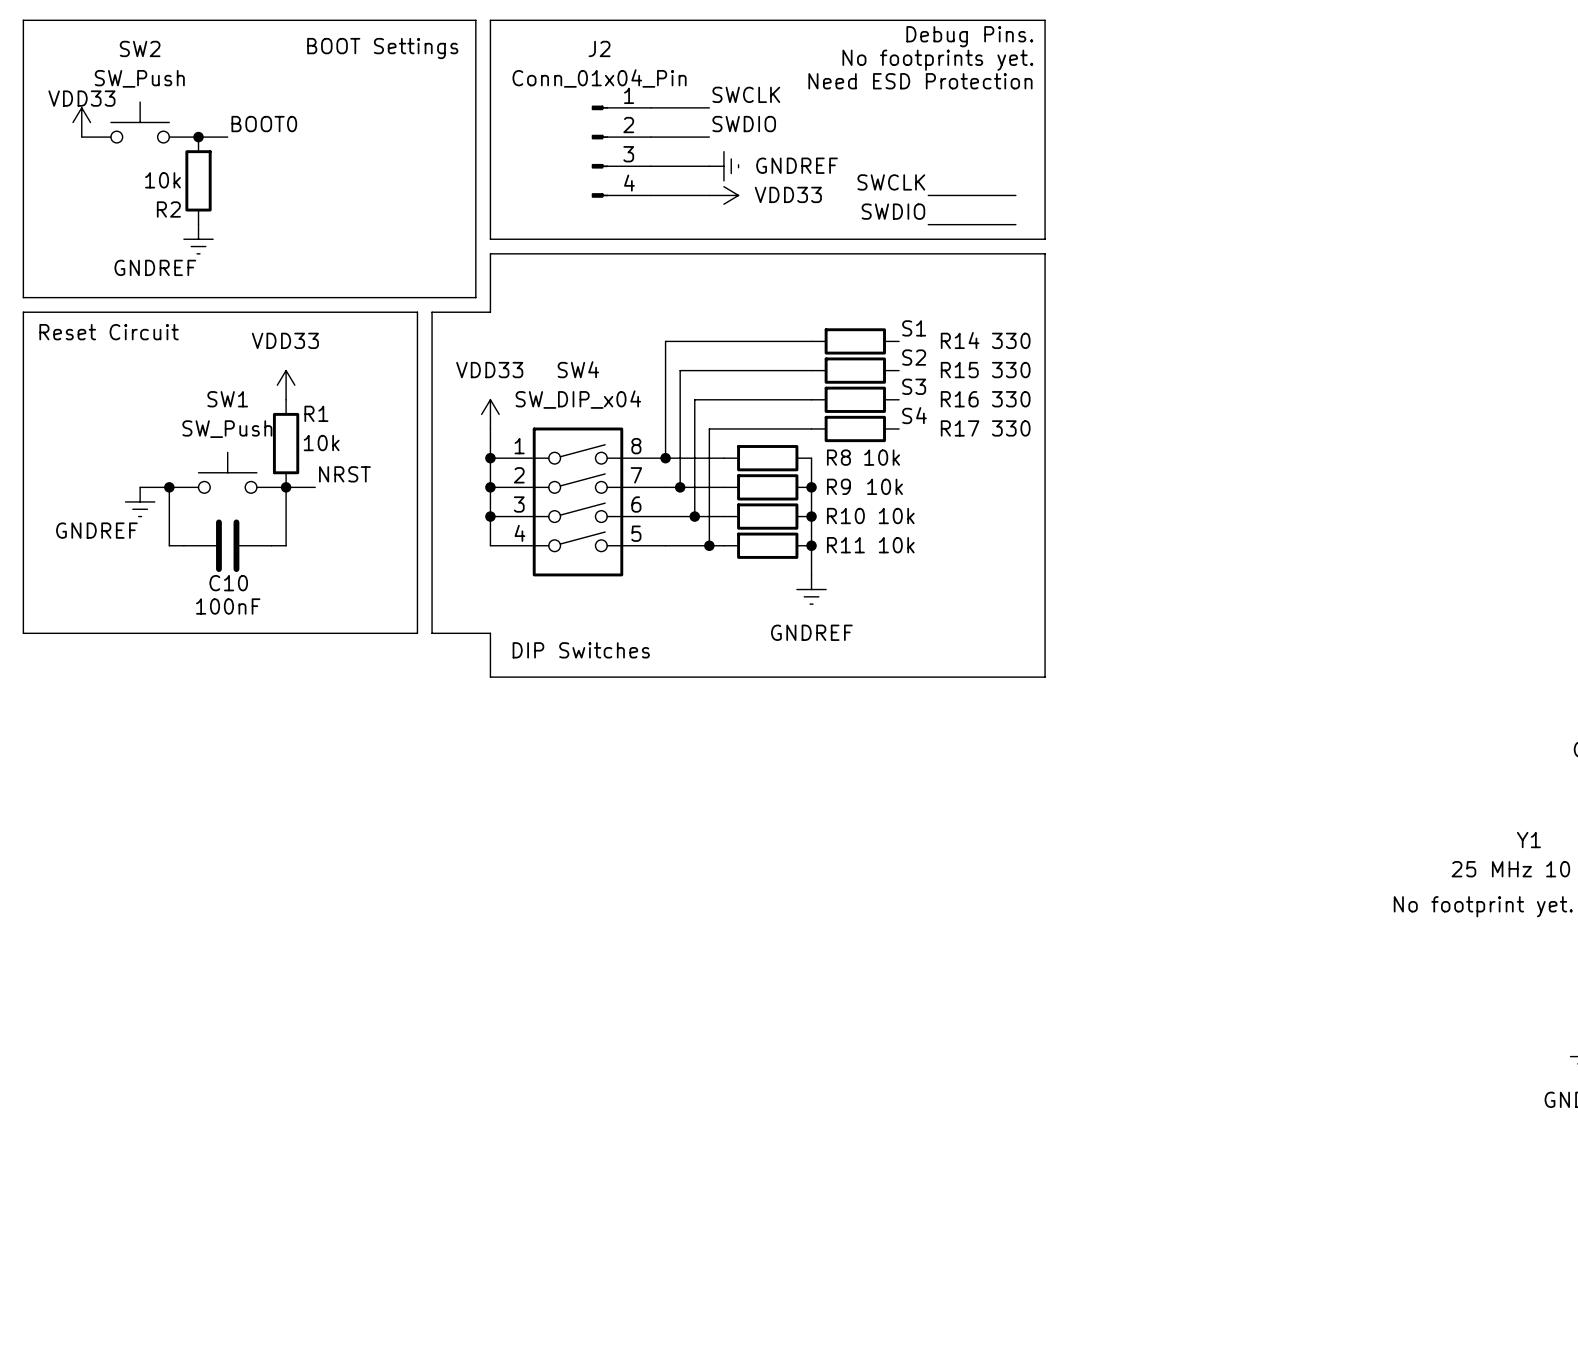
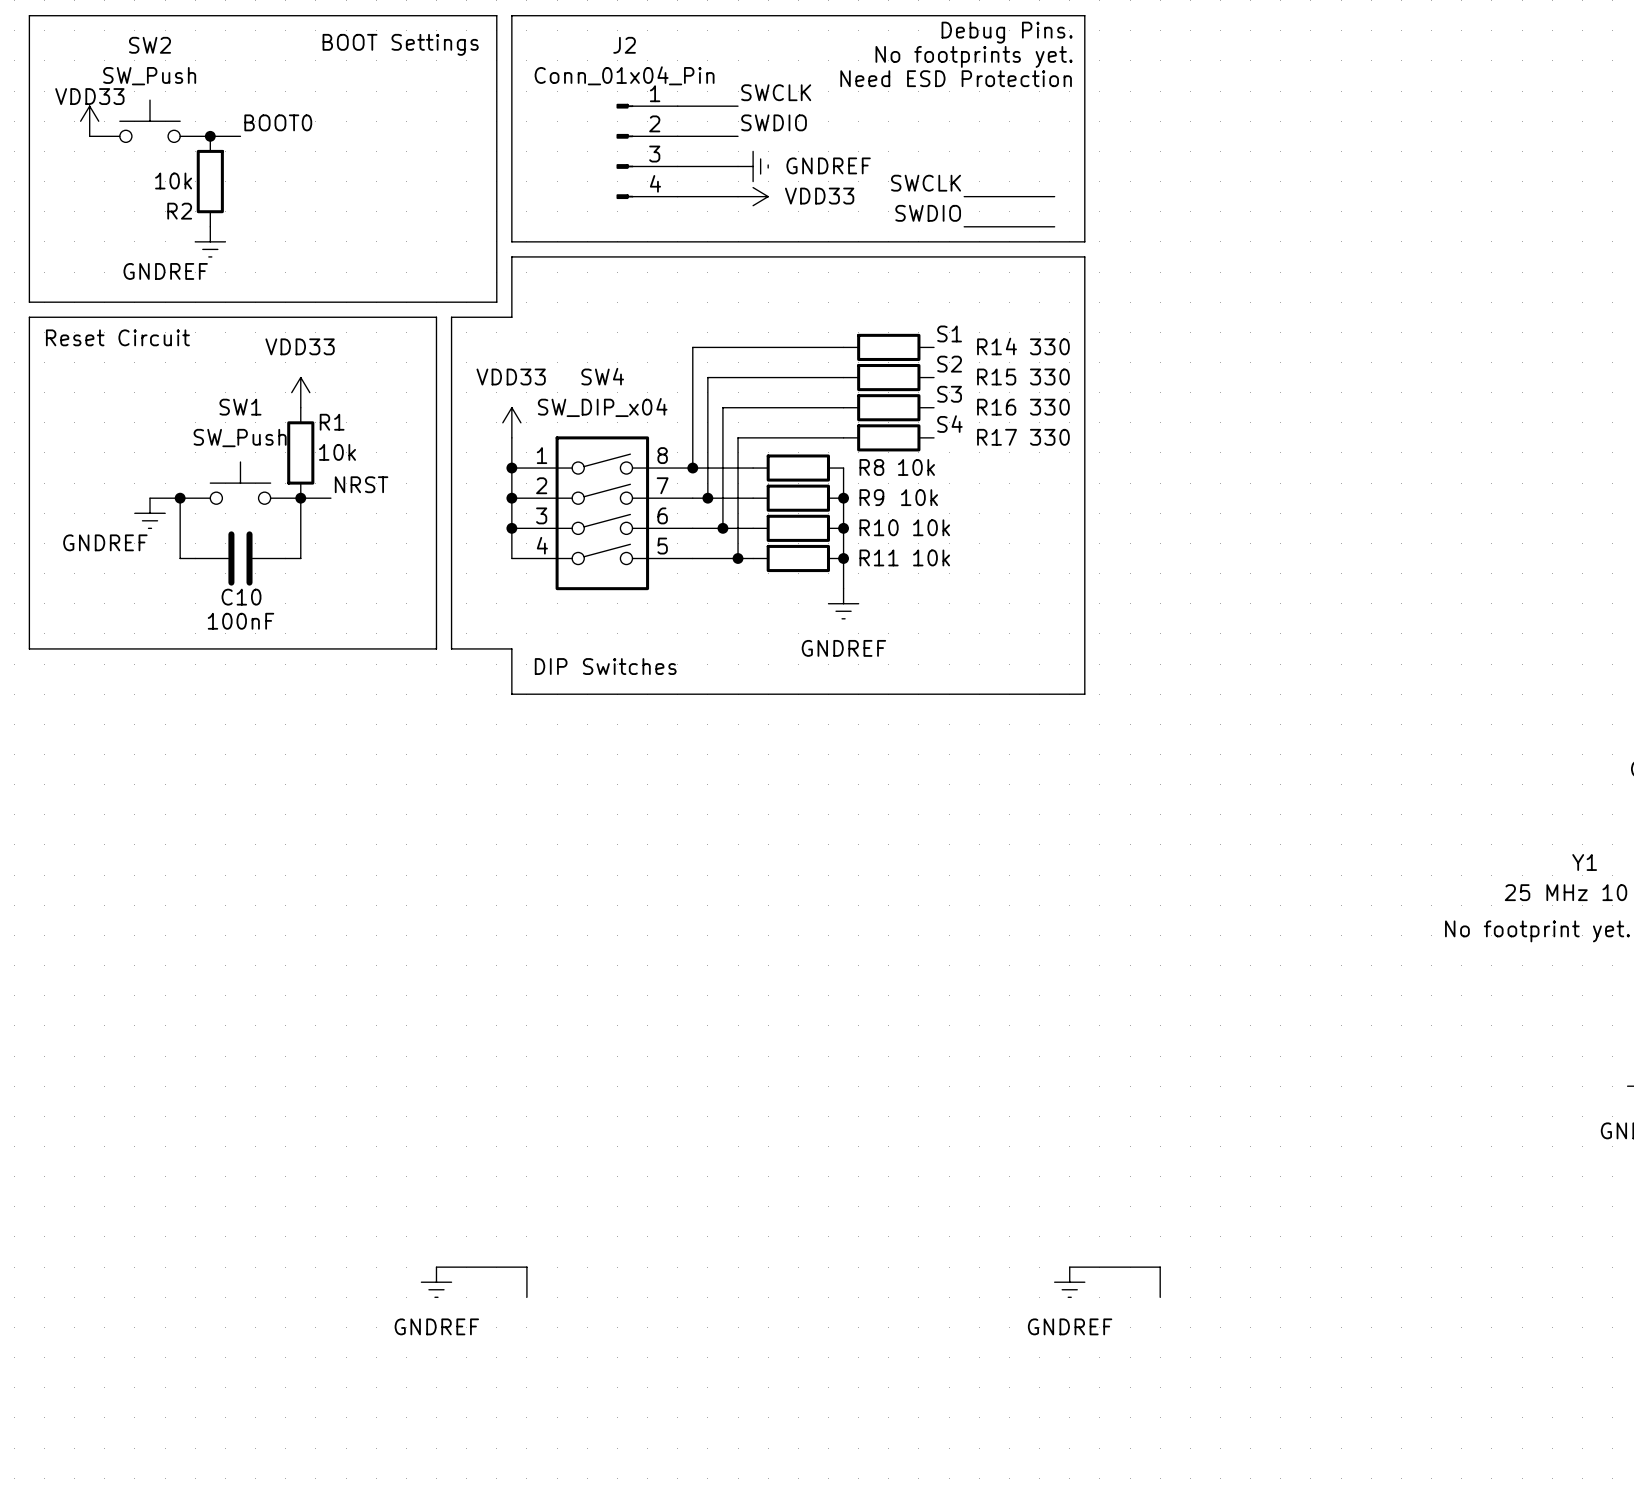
wire: none -> (436, 1267) (526, 1267) (526, 1297)
wire: none -> (1069, 1267) (1160, 1267) (1160, 1297)
power symbol: none -> GNDREF (436, 1282)
power symbol: none -> GNDREF (1069, 1282)

